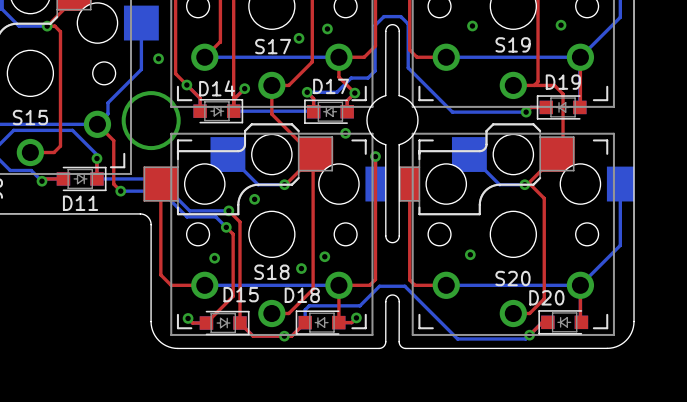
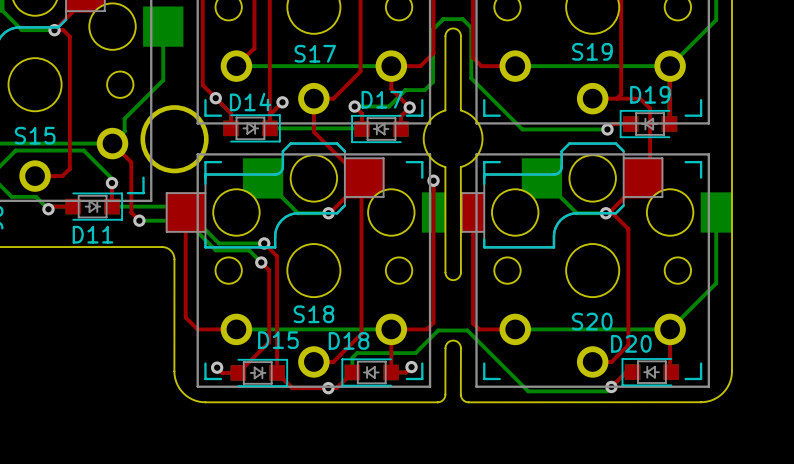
via: (561, 25) -> none
via: (472, 26) -> none
via: (327, 28) -> none
via: (299, 38) -> none
via: (158, 58) -> none
via: (345, 133) -> none
via: (254, 199) -> none
via: (470, 254) -> none
via: (324, 256) -> none
via: (214, 258) -> none
via: (301, 268) -> none

